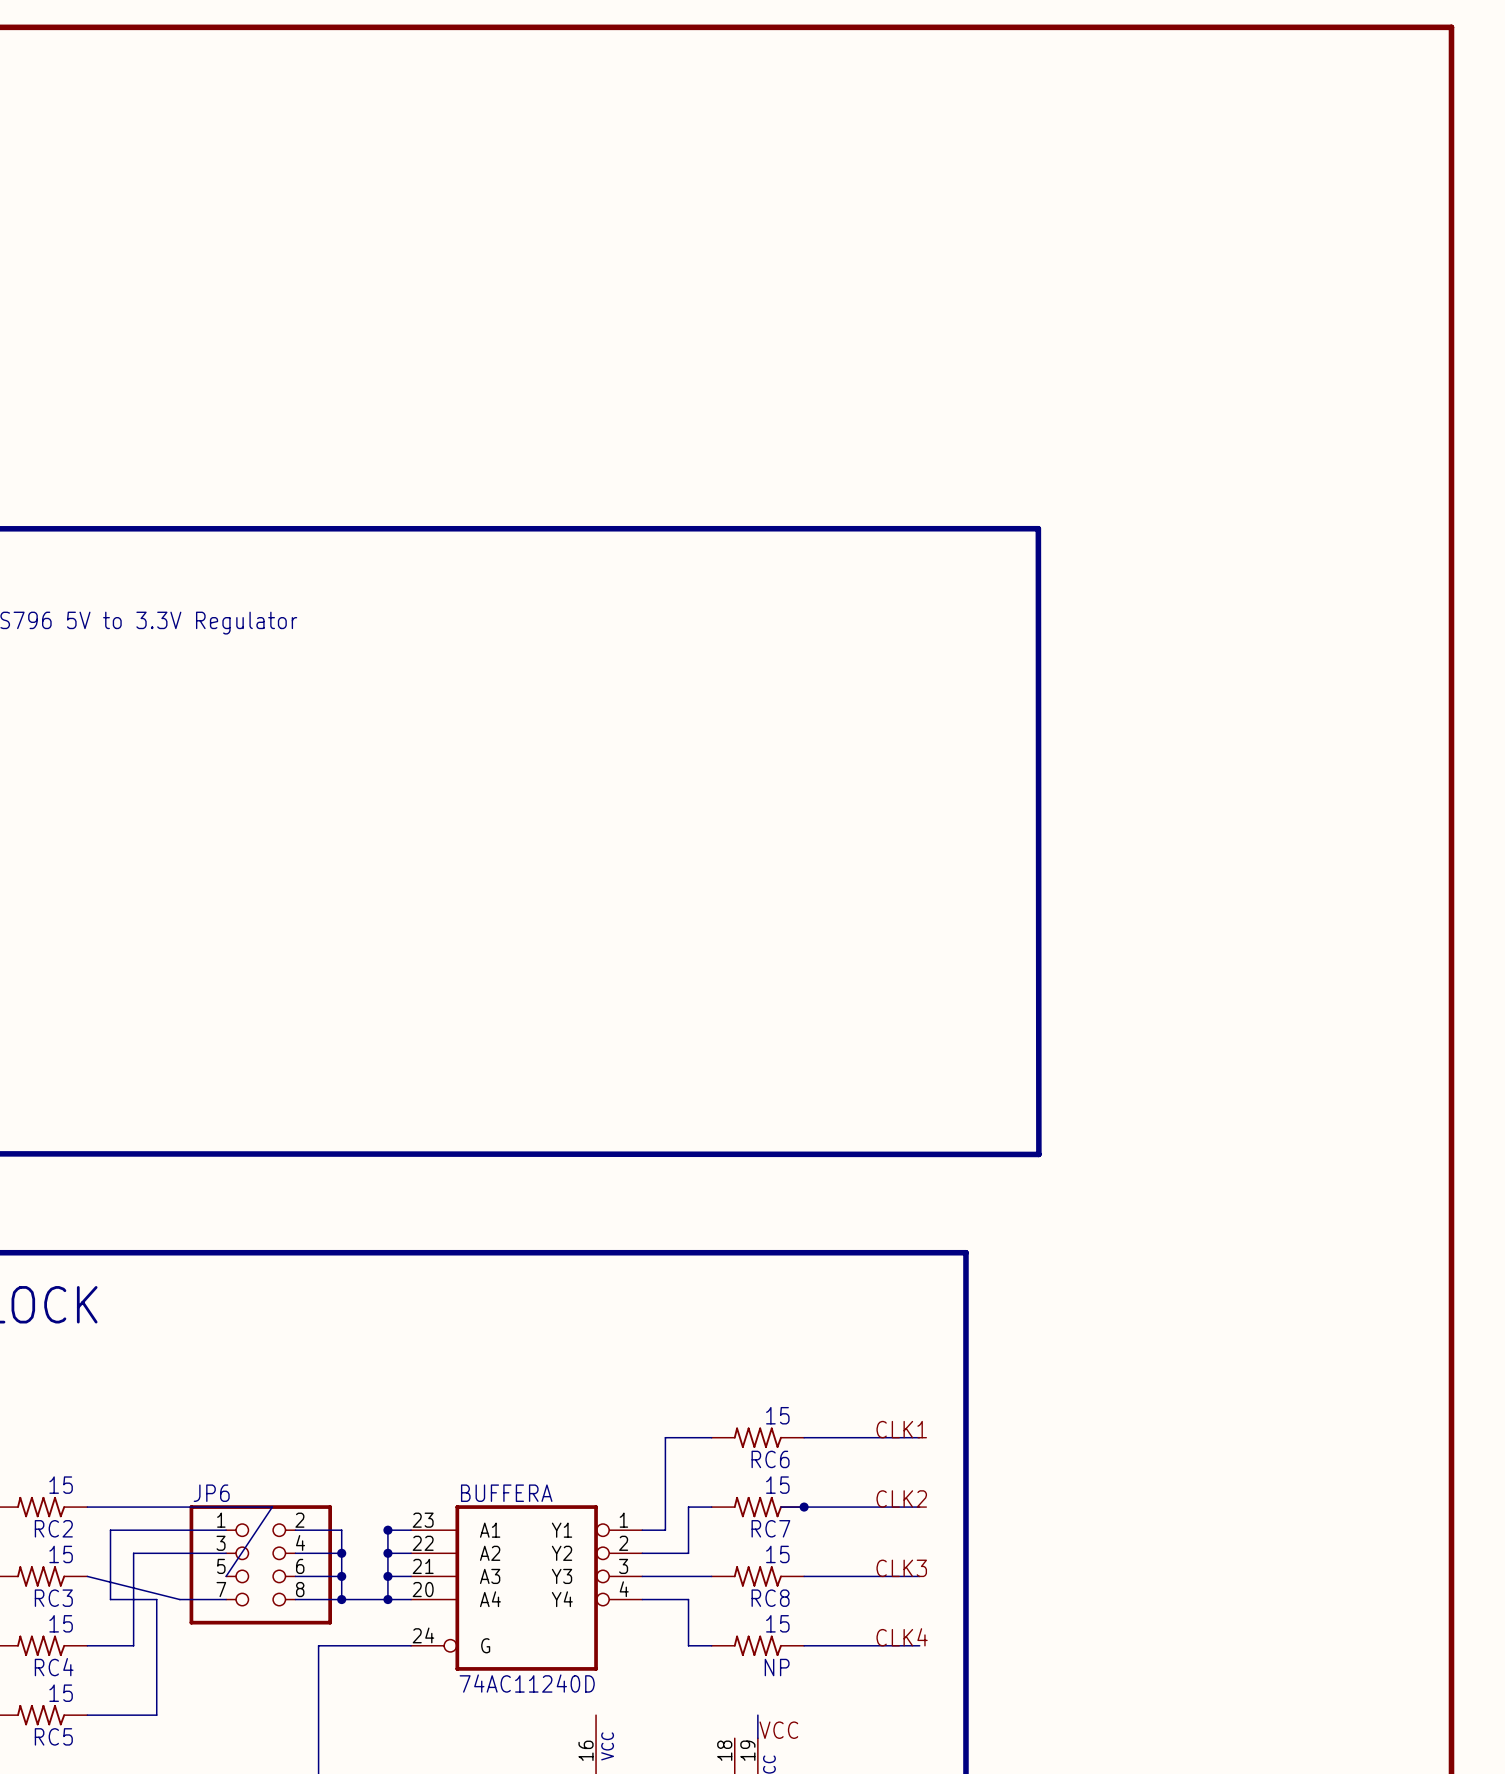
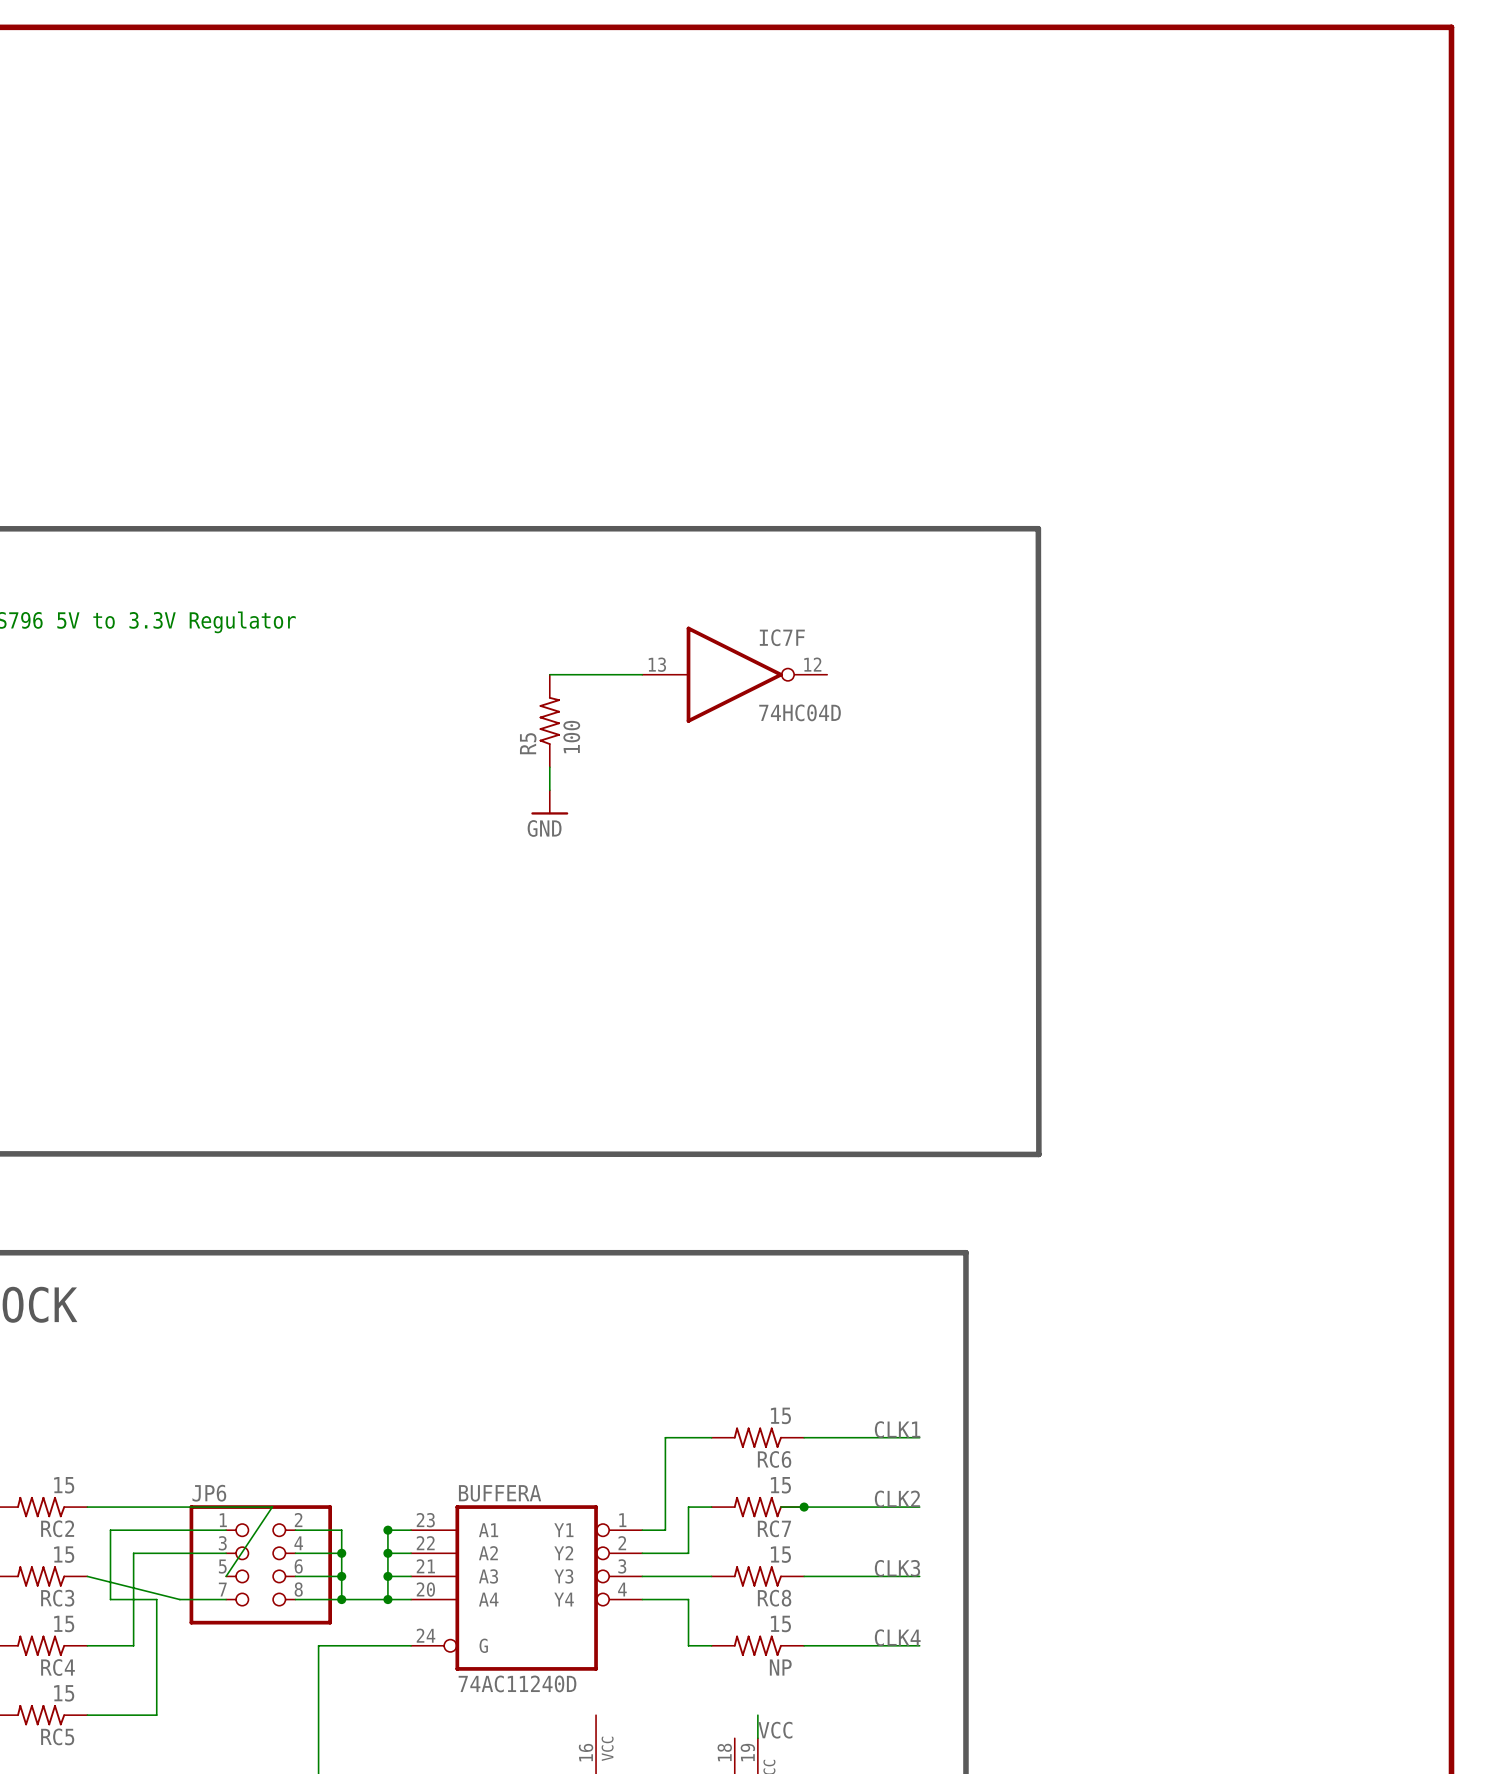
wire: none -> (549, 674) (642, 674)
IC7F: none -> 74HC04D (734, 674)
R5: none -> 100 (549, 720)
wire: none -> (549, 767) (549, 790)
power symbol: none -> GND (549, 802)

